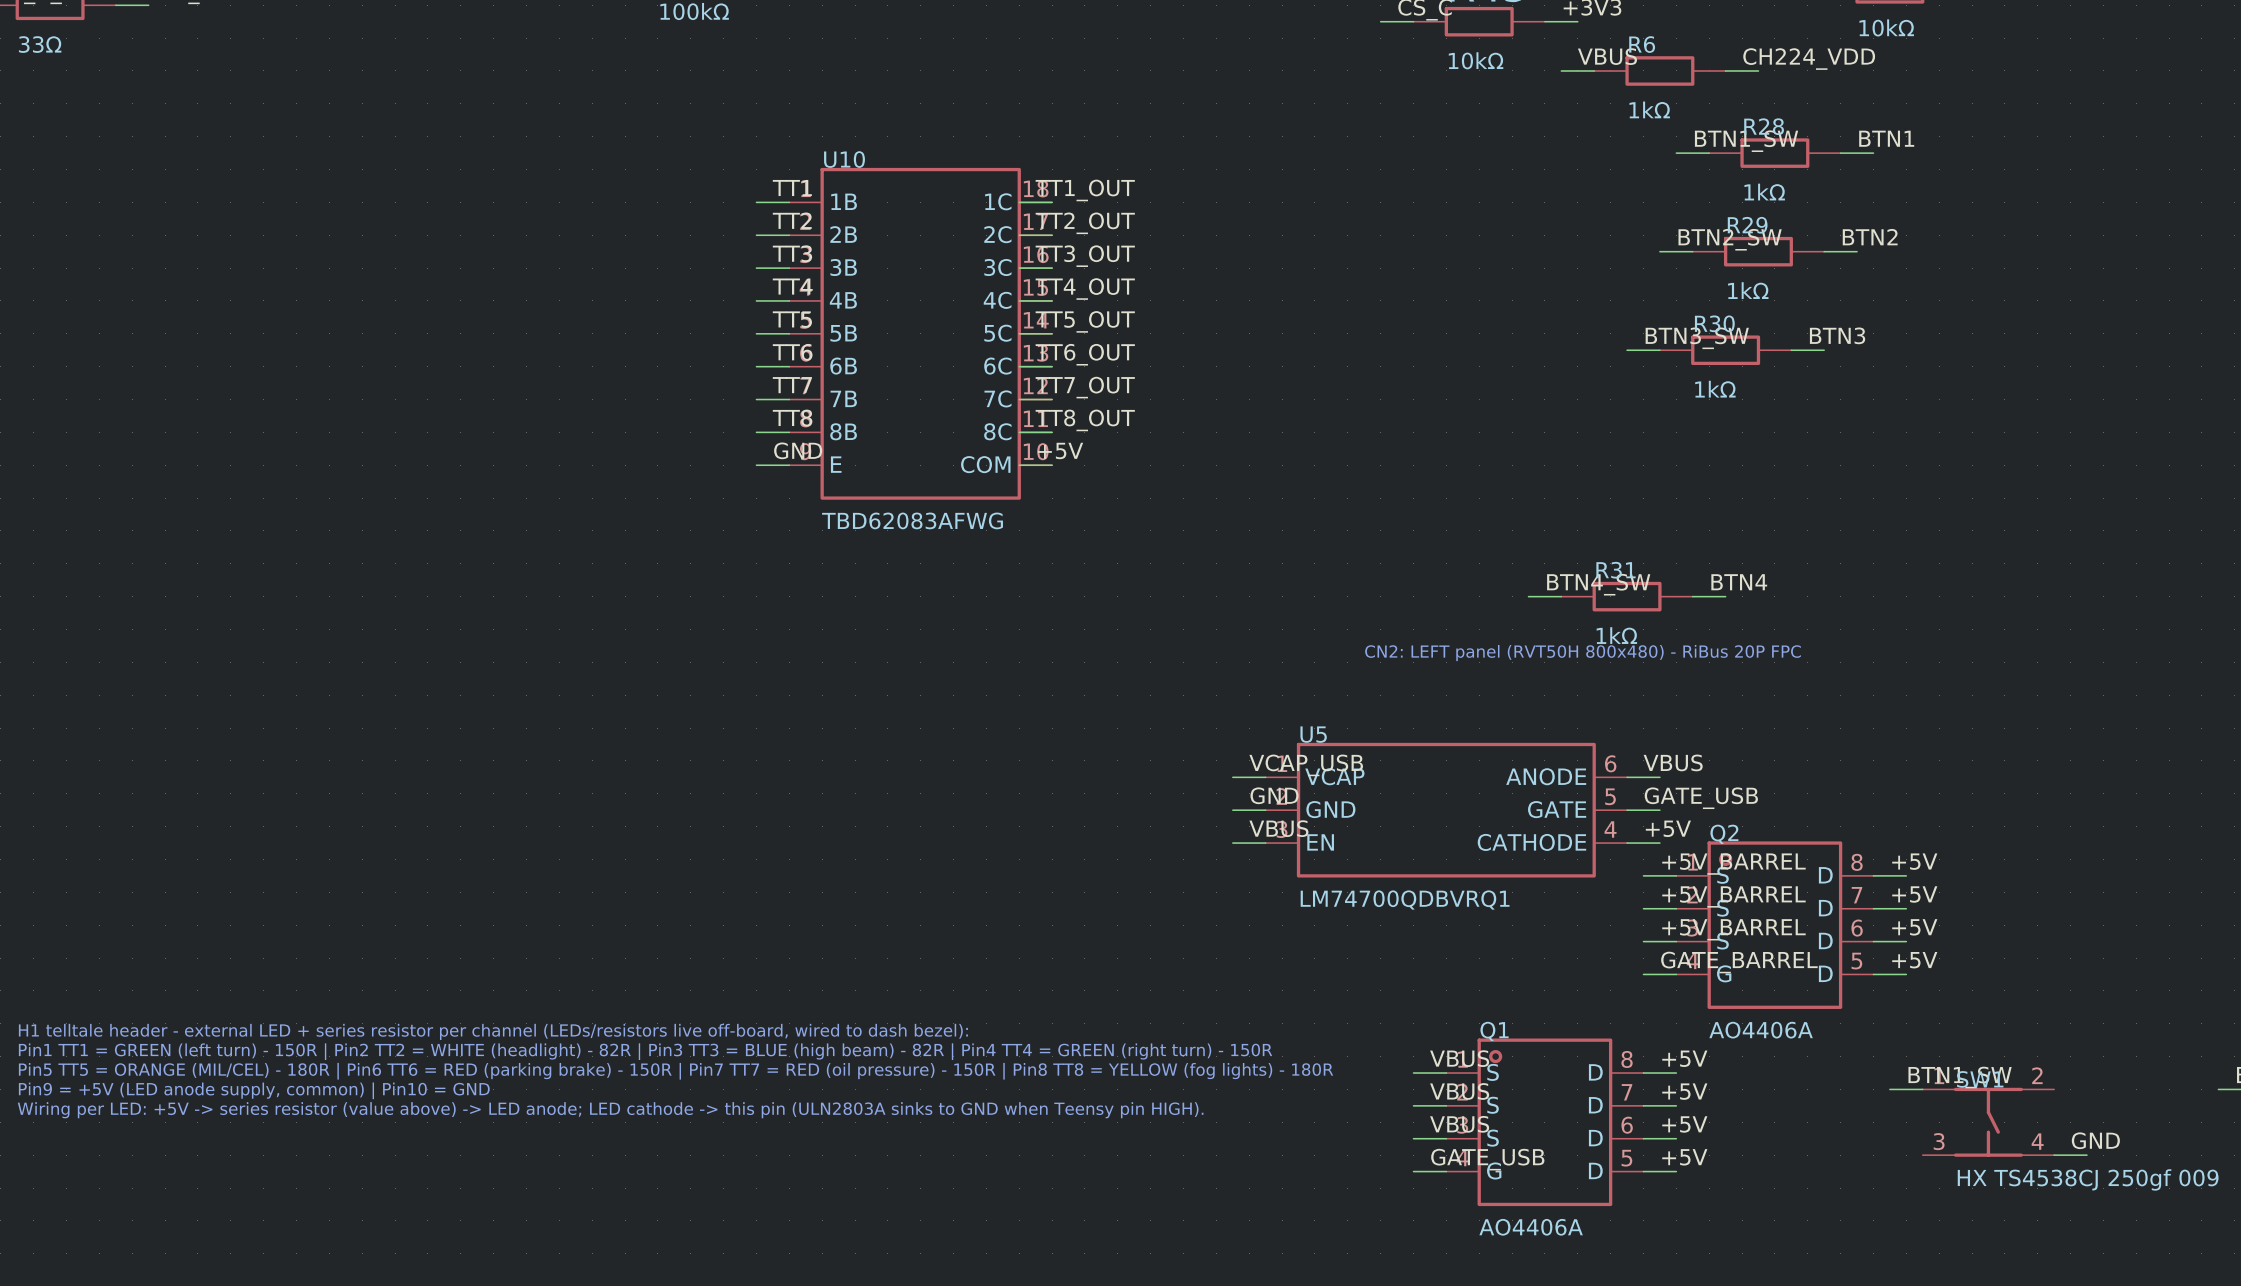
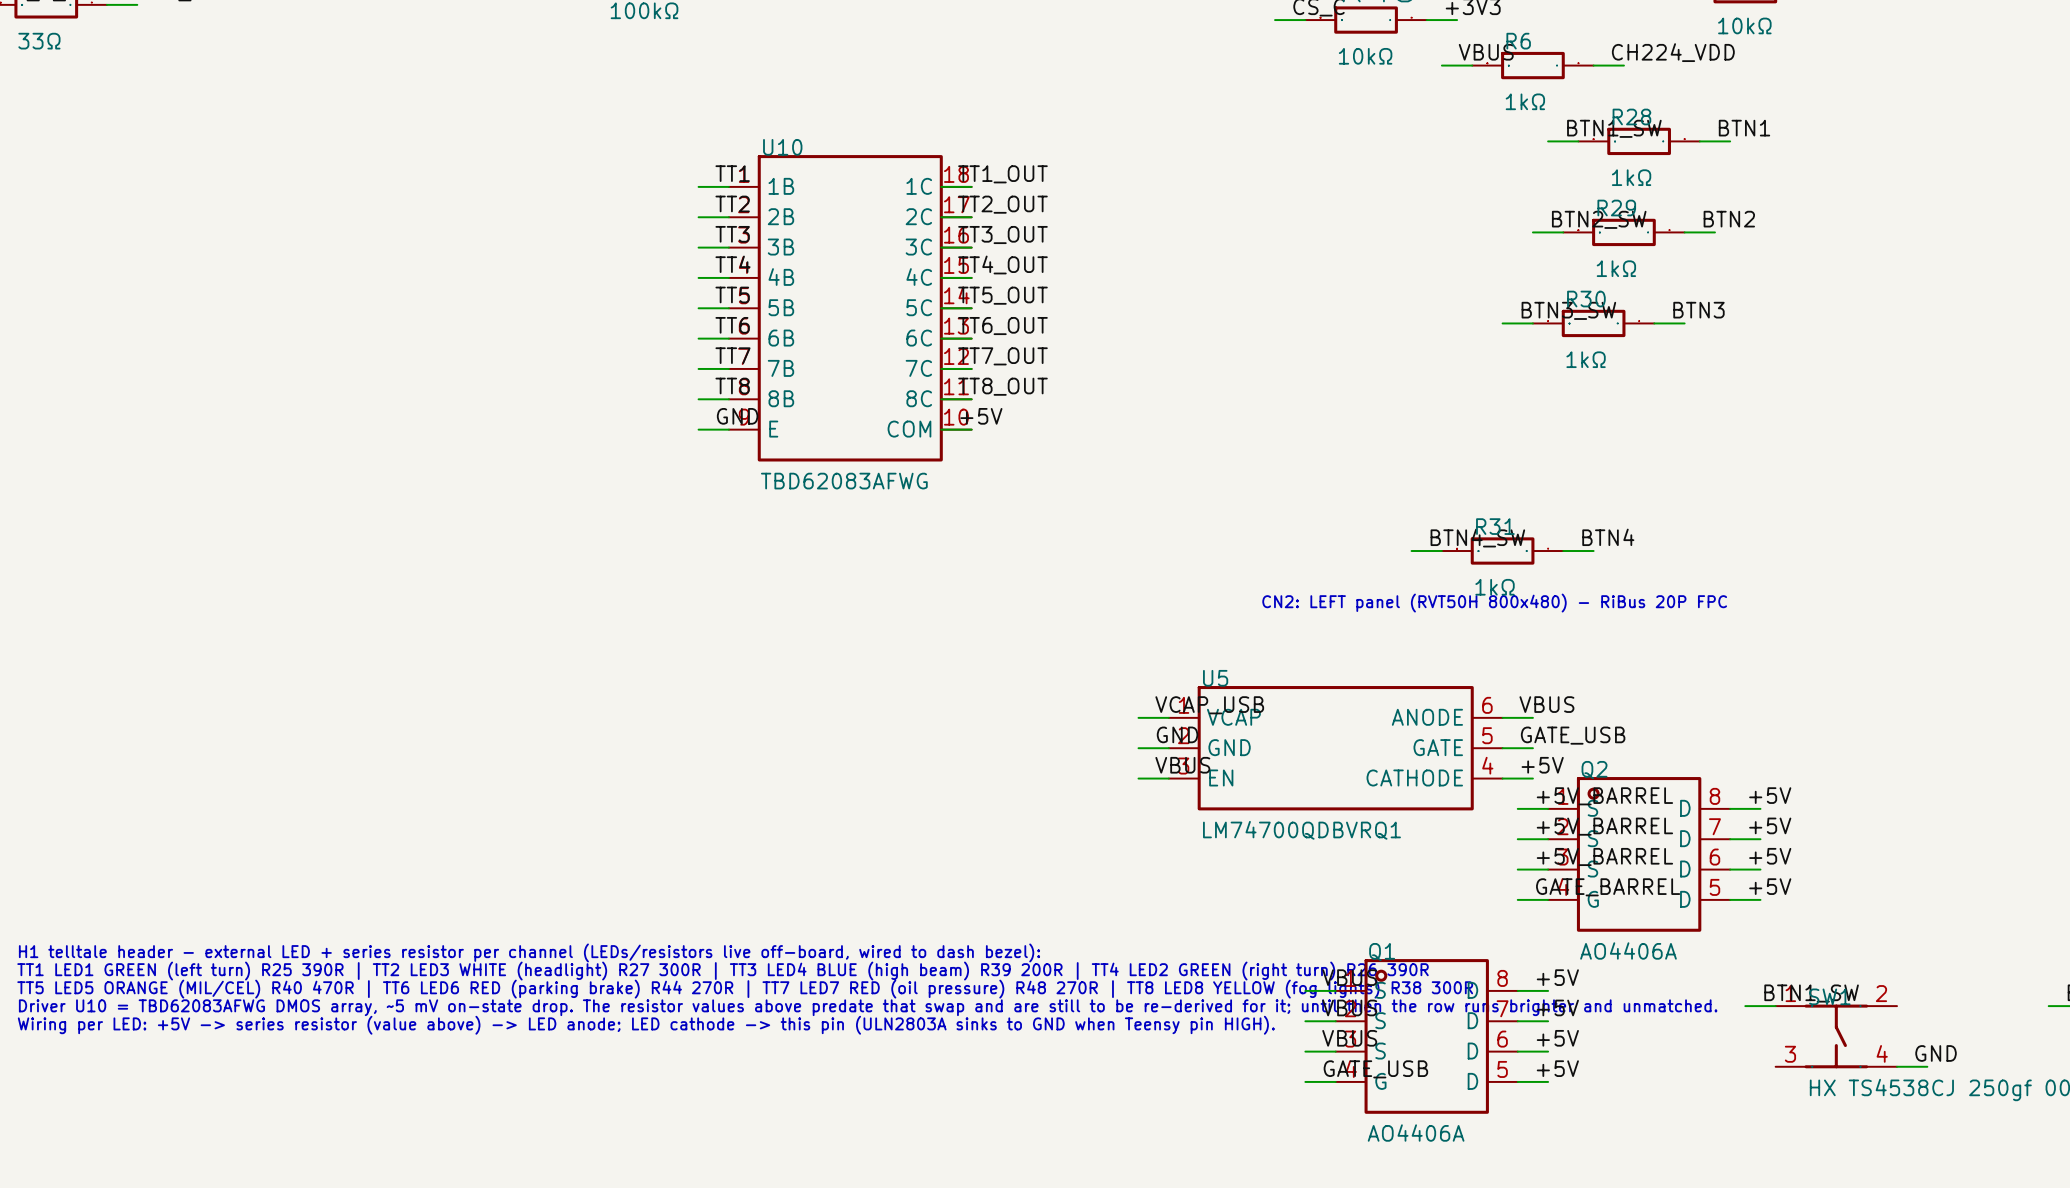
text: Pin1 TT1 = GREEN (left turn) - 150R | Pin2 TT2 = WHITE (headlight) - 82R | Pin3 TT3 = BLUE (high beam) - 82R | Pin4 TT4 = GREEN (right turn) - 150R (645, 1051) -> TT1 LED1 GREEN (left turn) R25 390R | TT2 LED3 WHITE (headlight) R27 300R | TT3 LED4 BLUE (high beam) R39 200R | TT4 LED2 GREEN (right turn) R26 390R (723, 971)
text: Pin5 TT5 = ORANGE (MIL/CEL) - 180R | Pin6 TT6 = RED (parking brake) - 150R | Pin7 TT7 = RED (oil pressure) - 150R | Pin8 TT8 = YELLOW (fog lights) - 180R (676, 1071) -> TT5 LED5 ORANGE (MIL/CEL) R40 470R | TT6 LED6 RED (parking brake) R44 270R | TT7 LED7 RED (oil pressure) R48 270R | TT8 LED8 YELLOW (fog lights) R38 300R (745, 989)
text: Pin9 = +5V (LED anode supply, common) | Pin10 = GND (254, 1090) -> Driver U10 = TBD62083AFWG DMOS array, ~5 mV on-state drop. The resistor values above predate that swap and are still to be re-derived for it; until then the row runs brighter and unmatched. (868, 1007)

